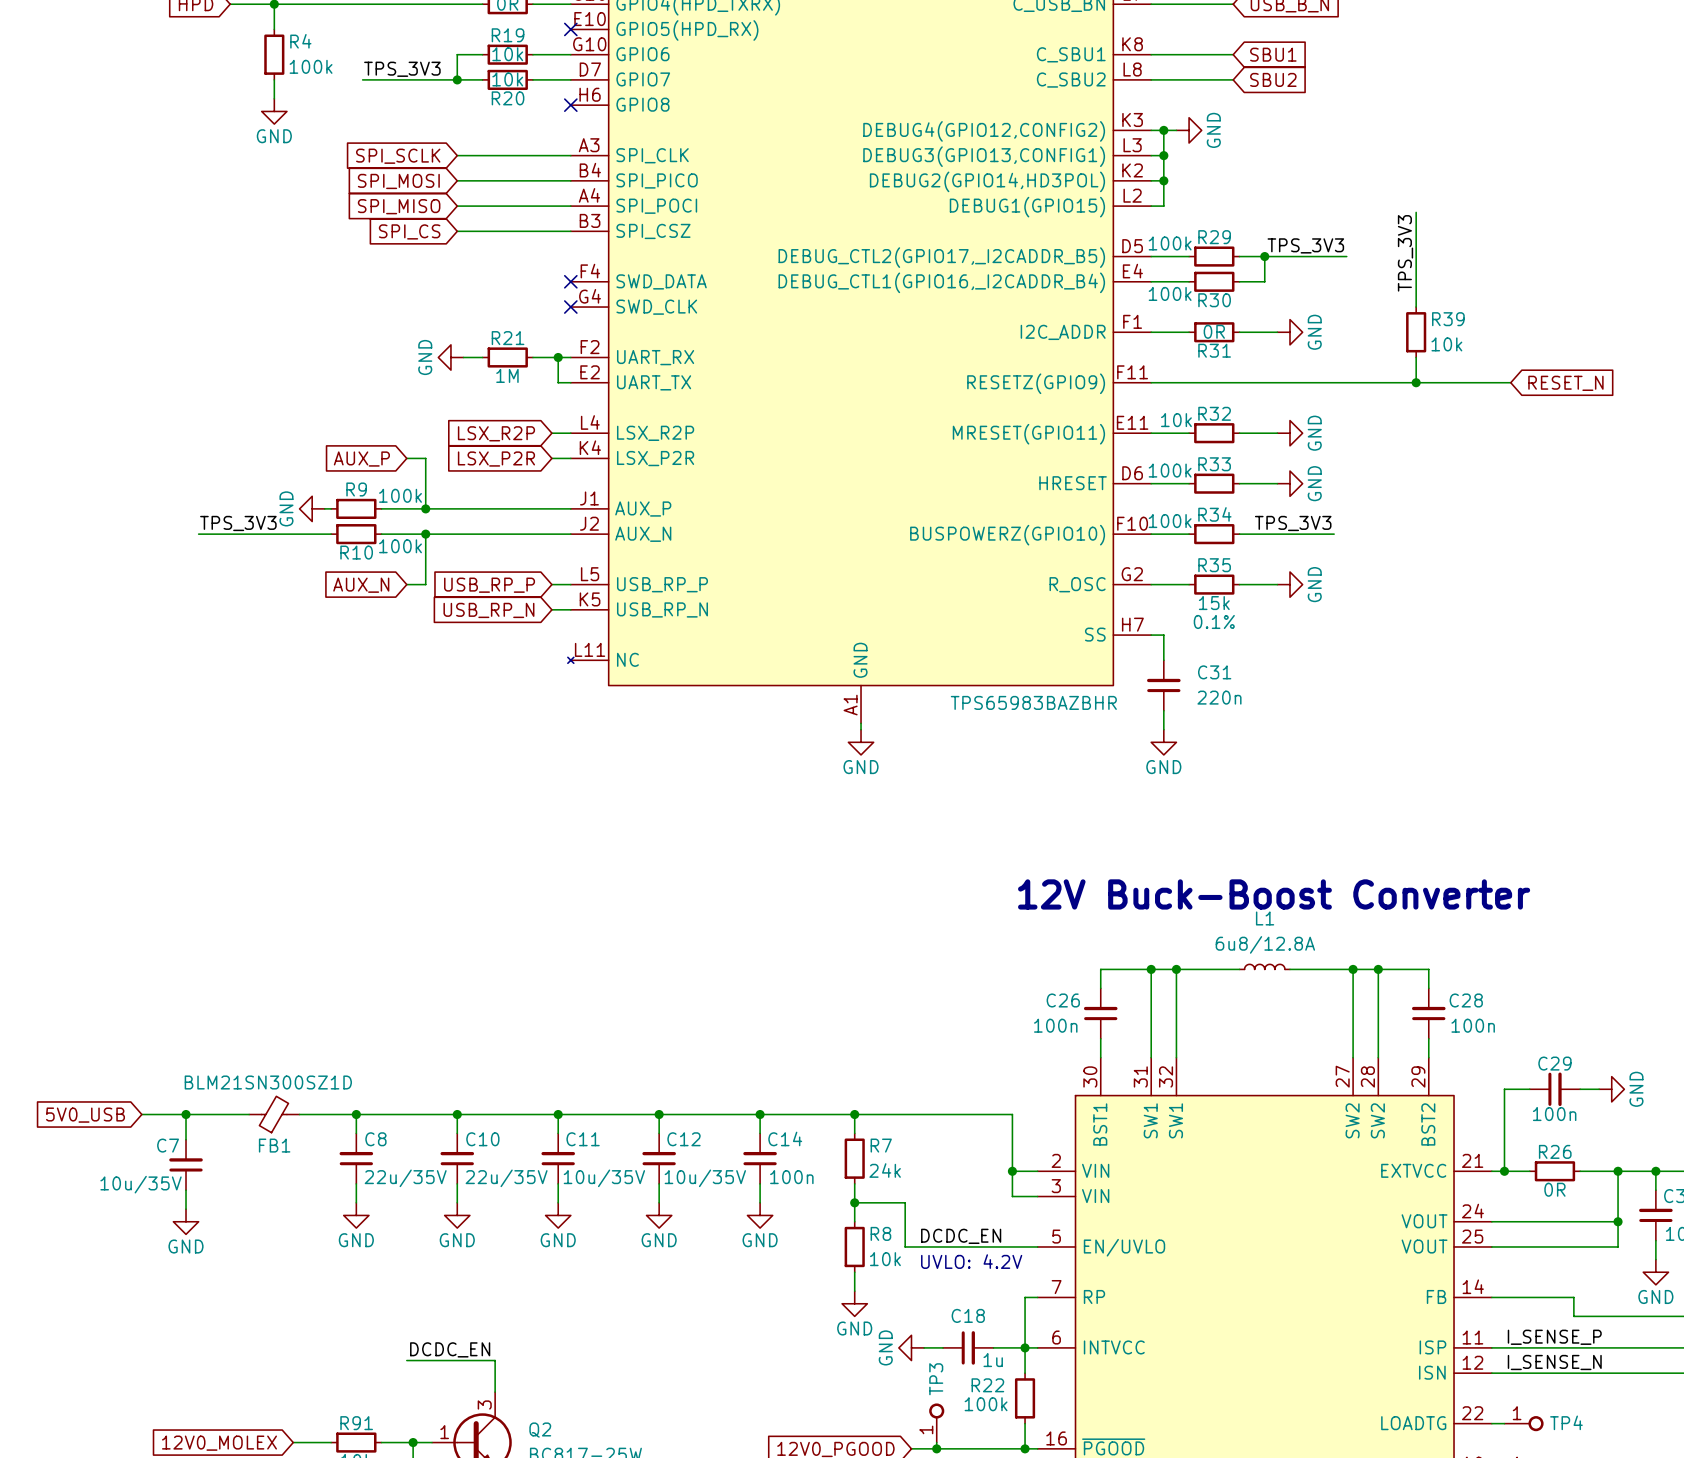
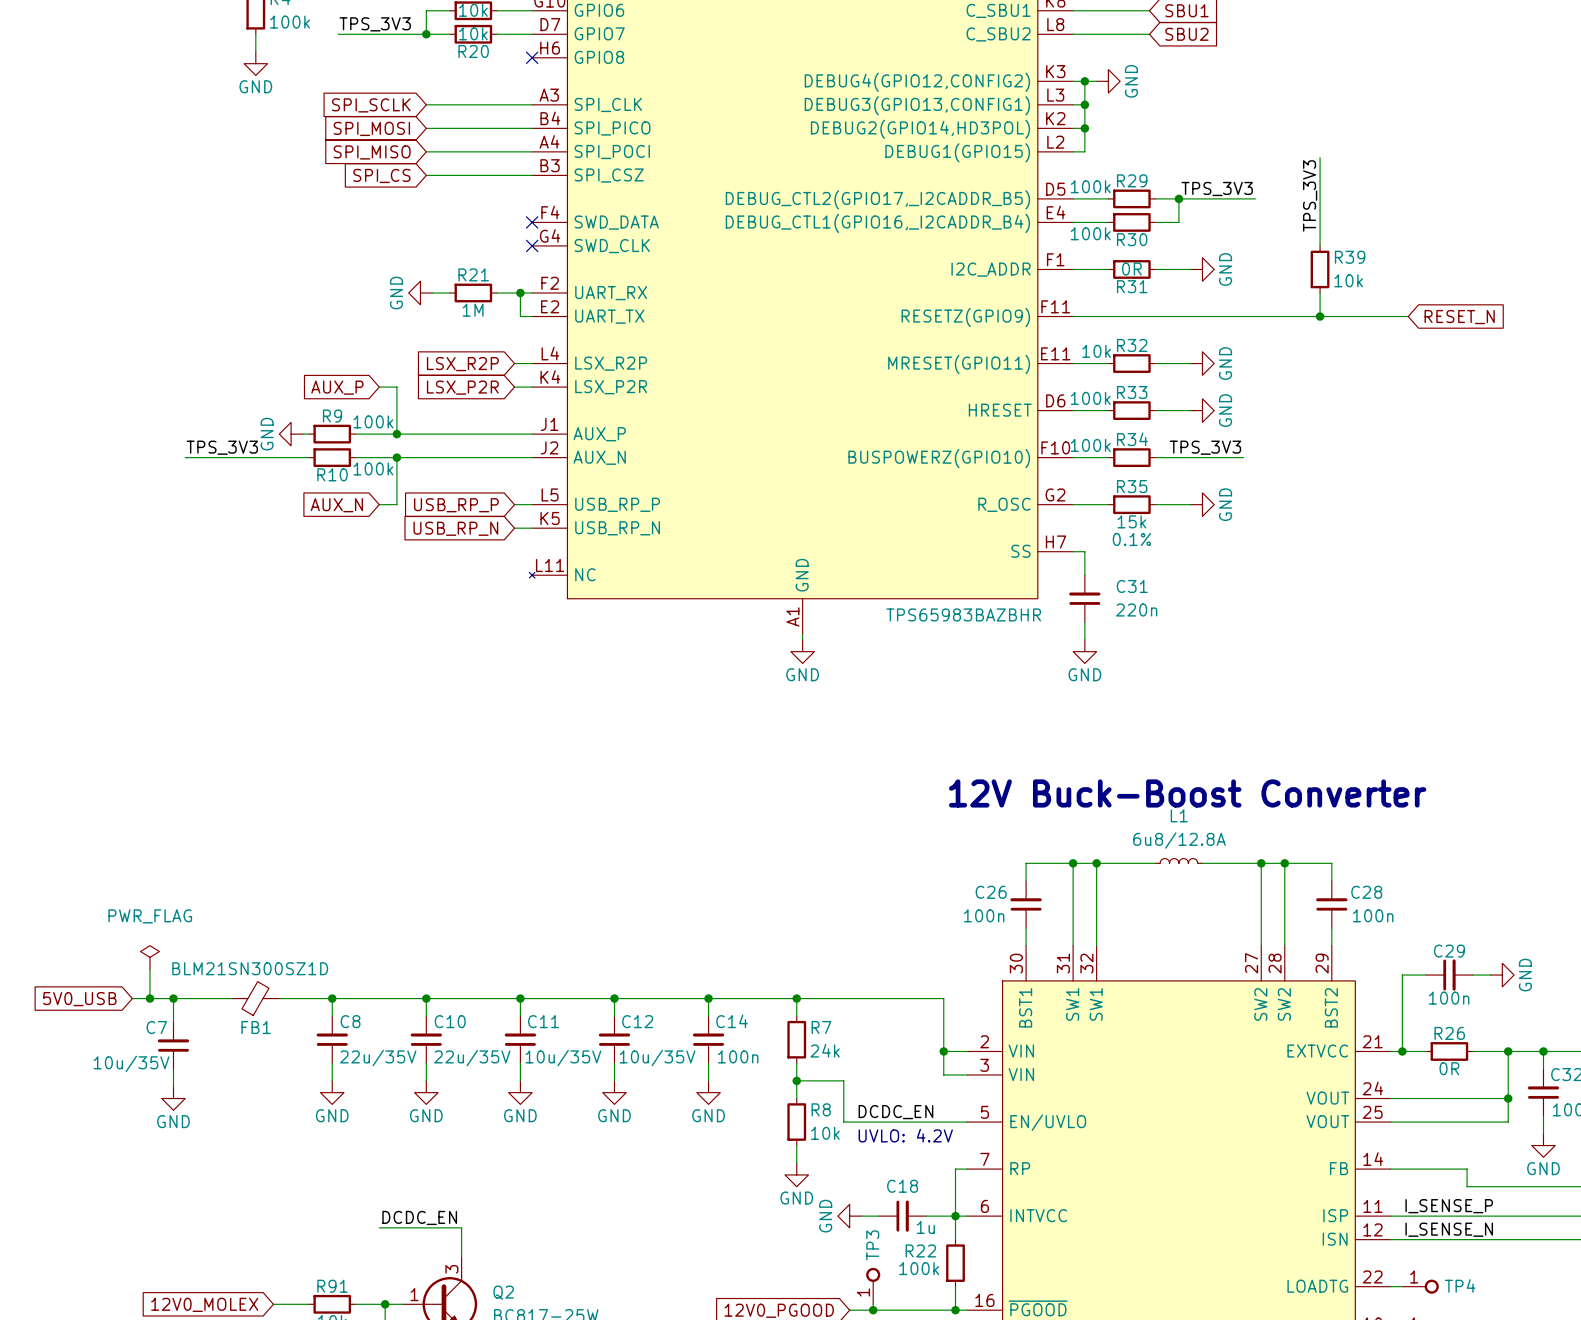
power symbol: none -> PWR_FLAG (149, 957)
wire: none -> (149, 969) (149, 998)
junction: none -> (149, 998)

